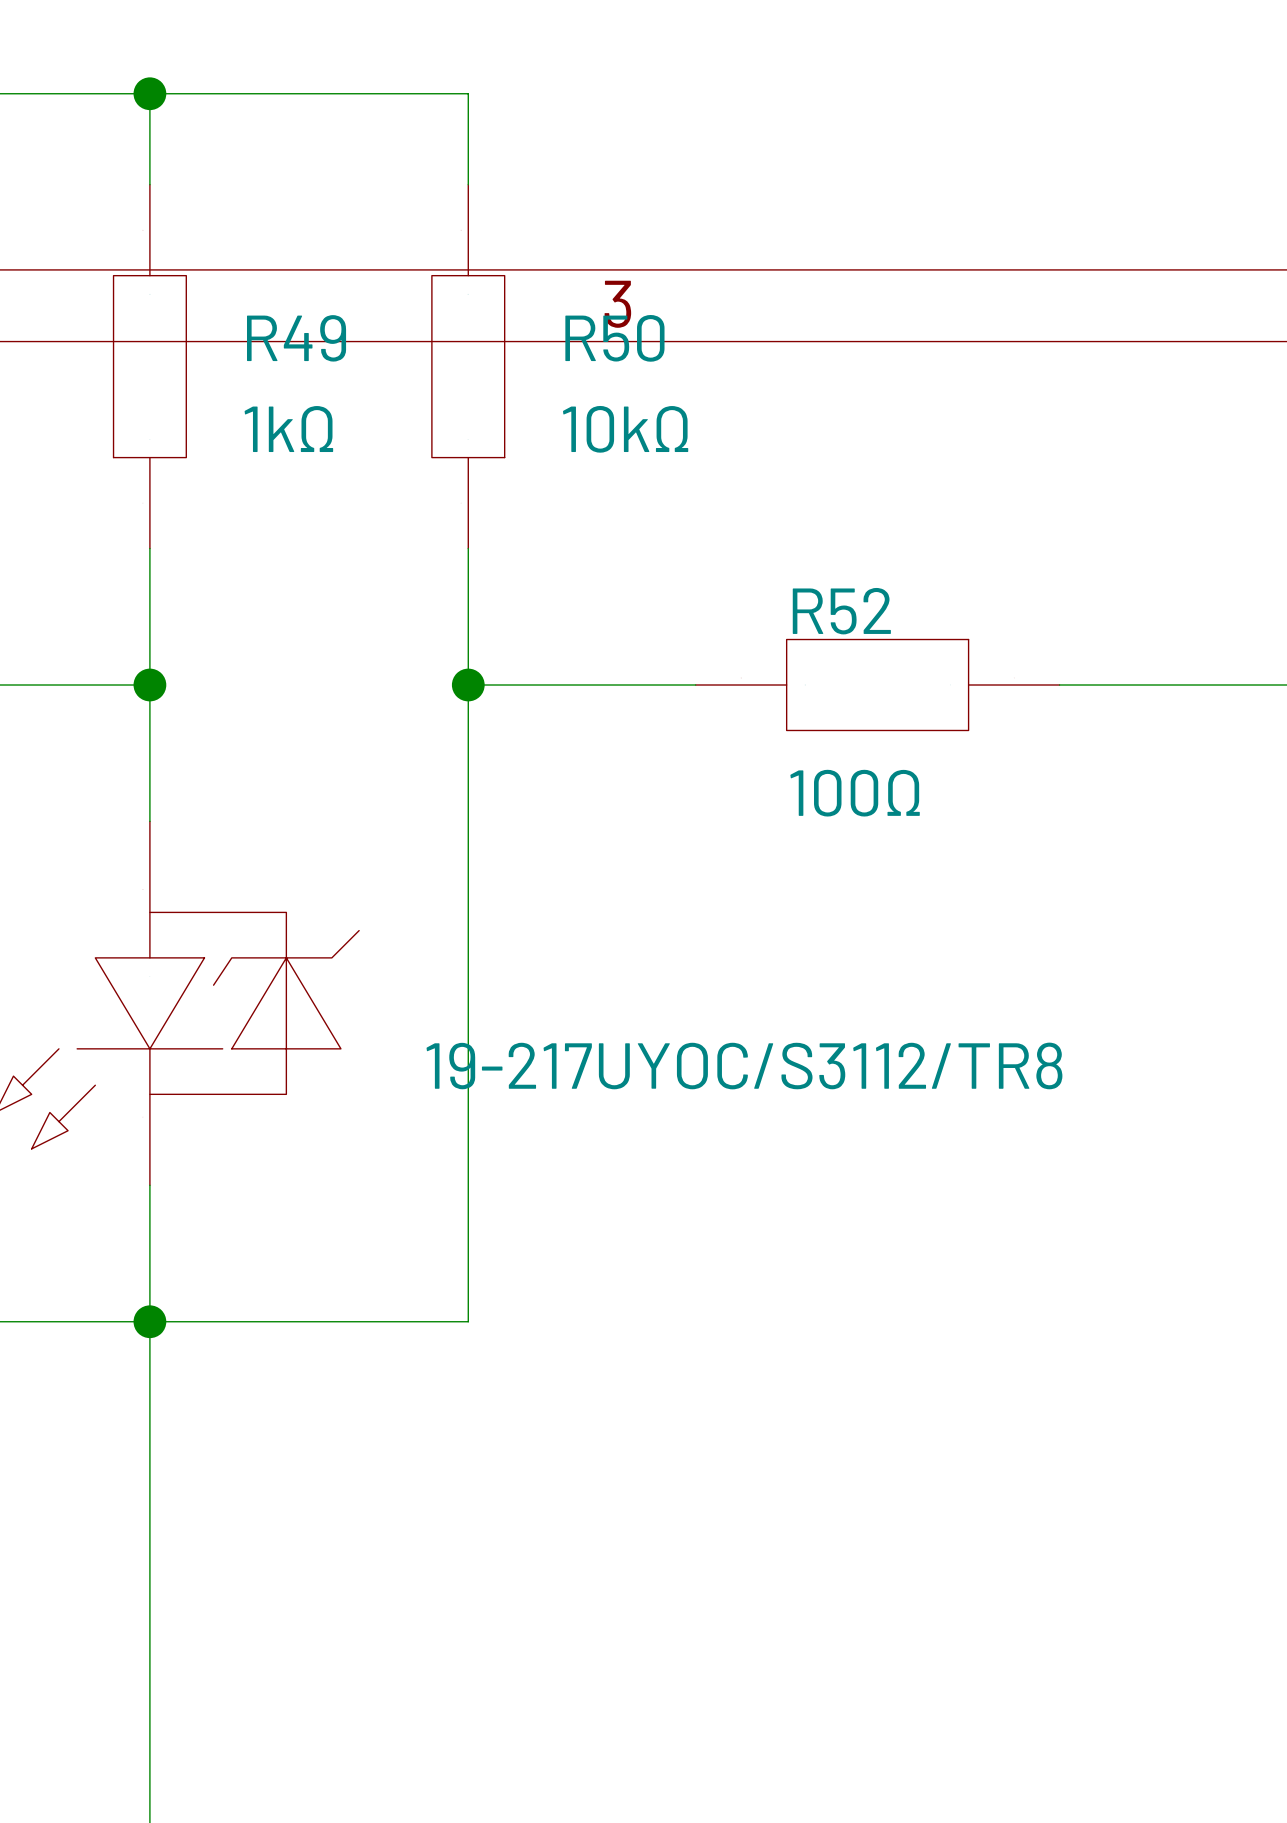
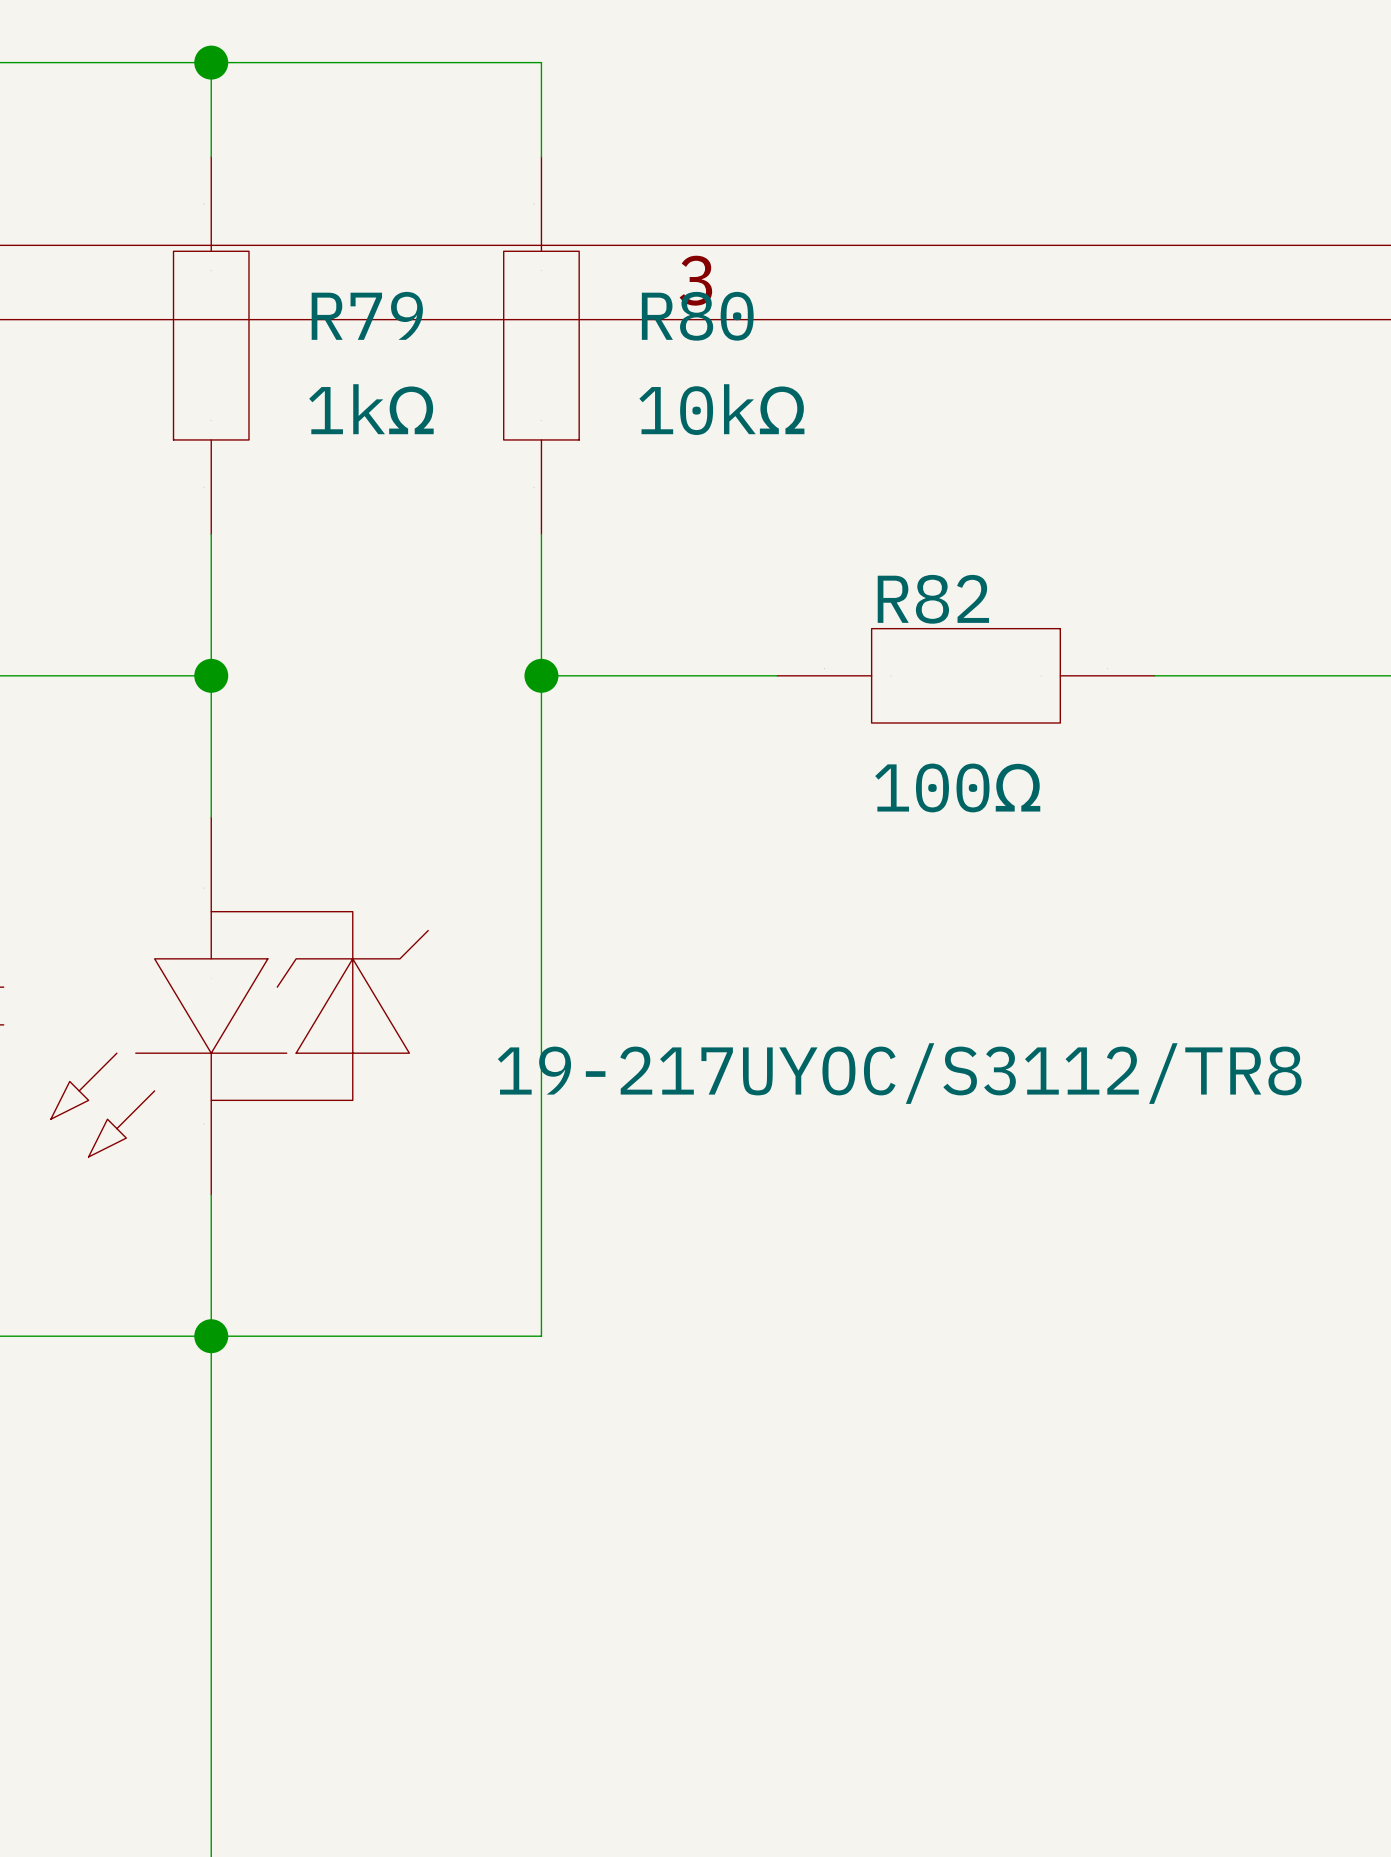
R49 name: R49 (296, 338) -> R79 (367, 315)
R50 name: R50 (614, 338) -> R80 (697, 316)
R52 name: R52 (841, 611) -> R82 (933, 599)

